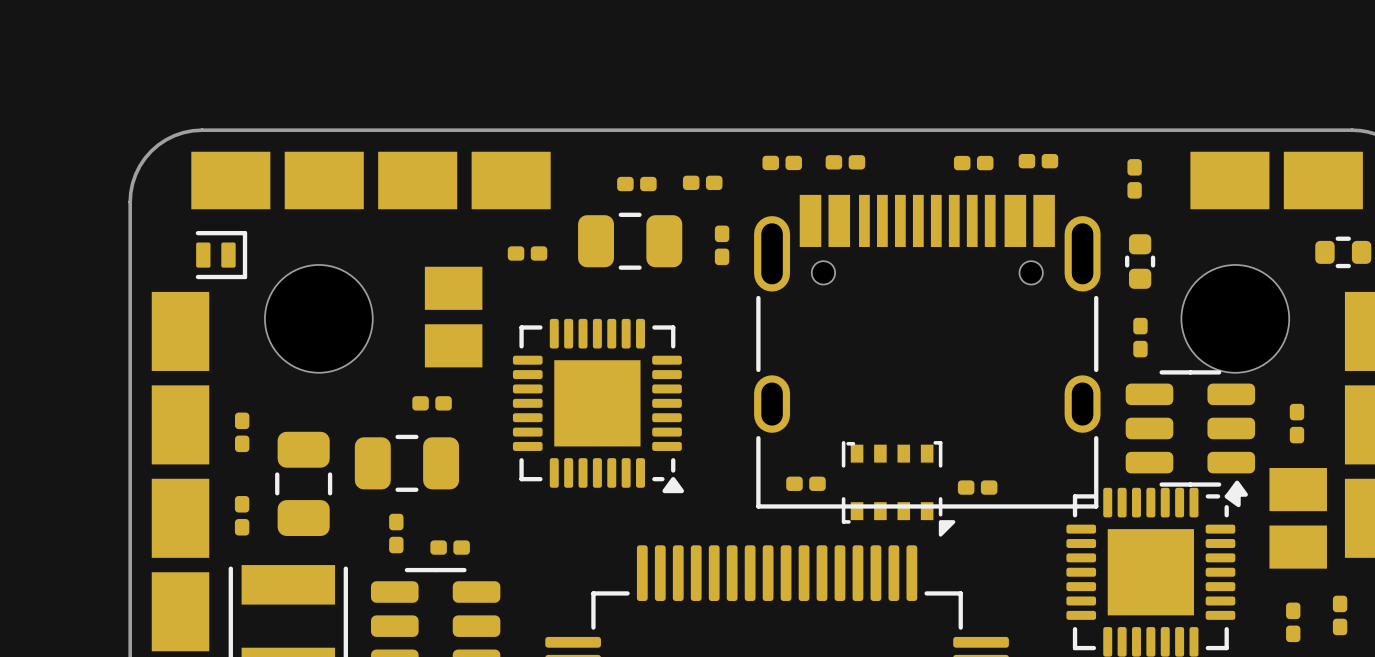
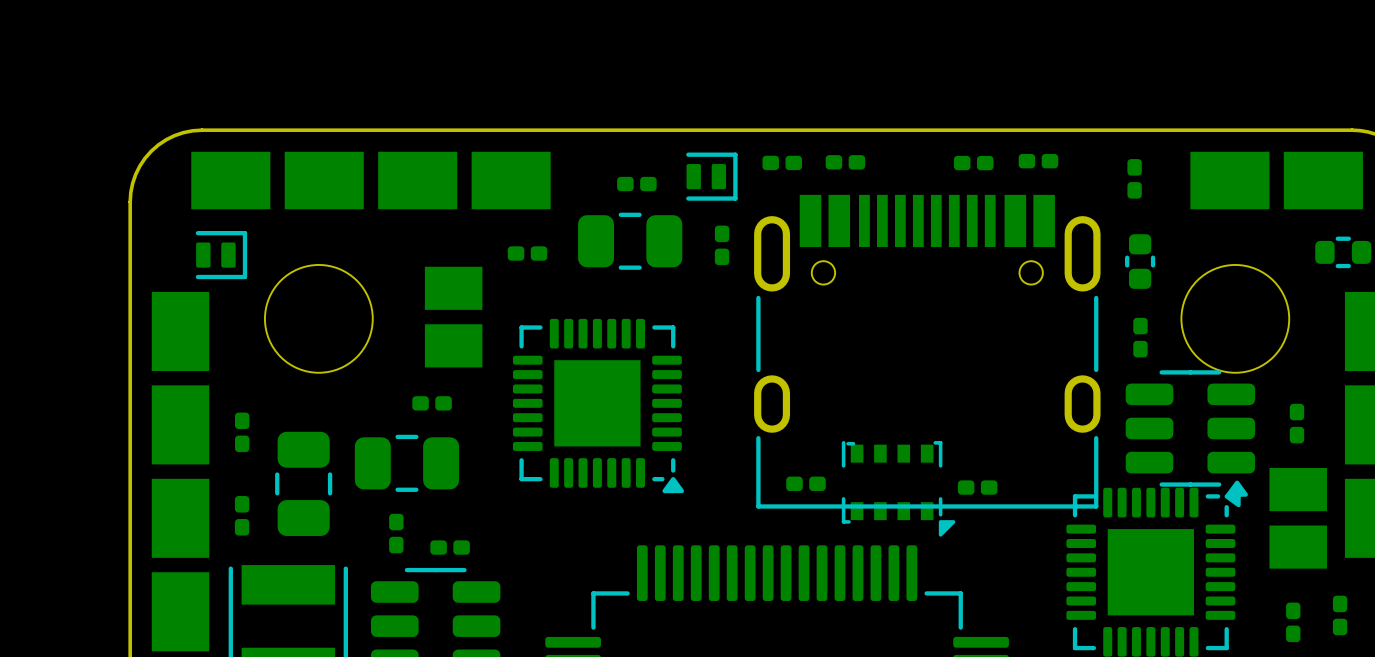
part footprint: [682, 175, 723, 191] -> [686, 152, 738, 201]

